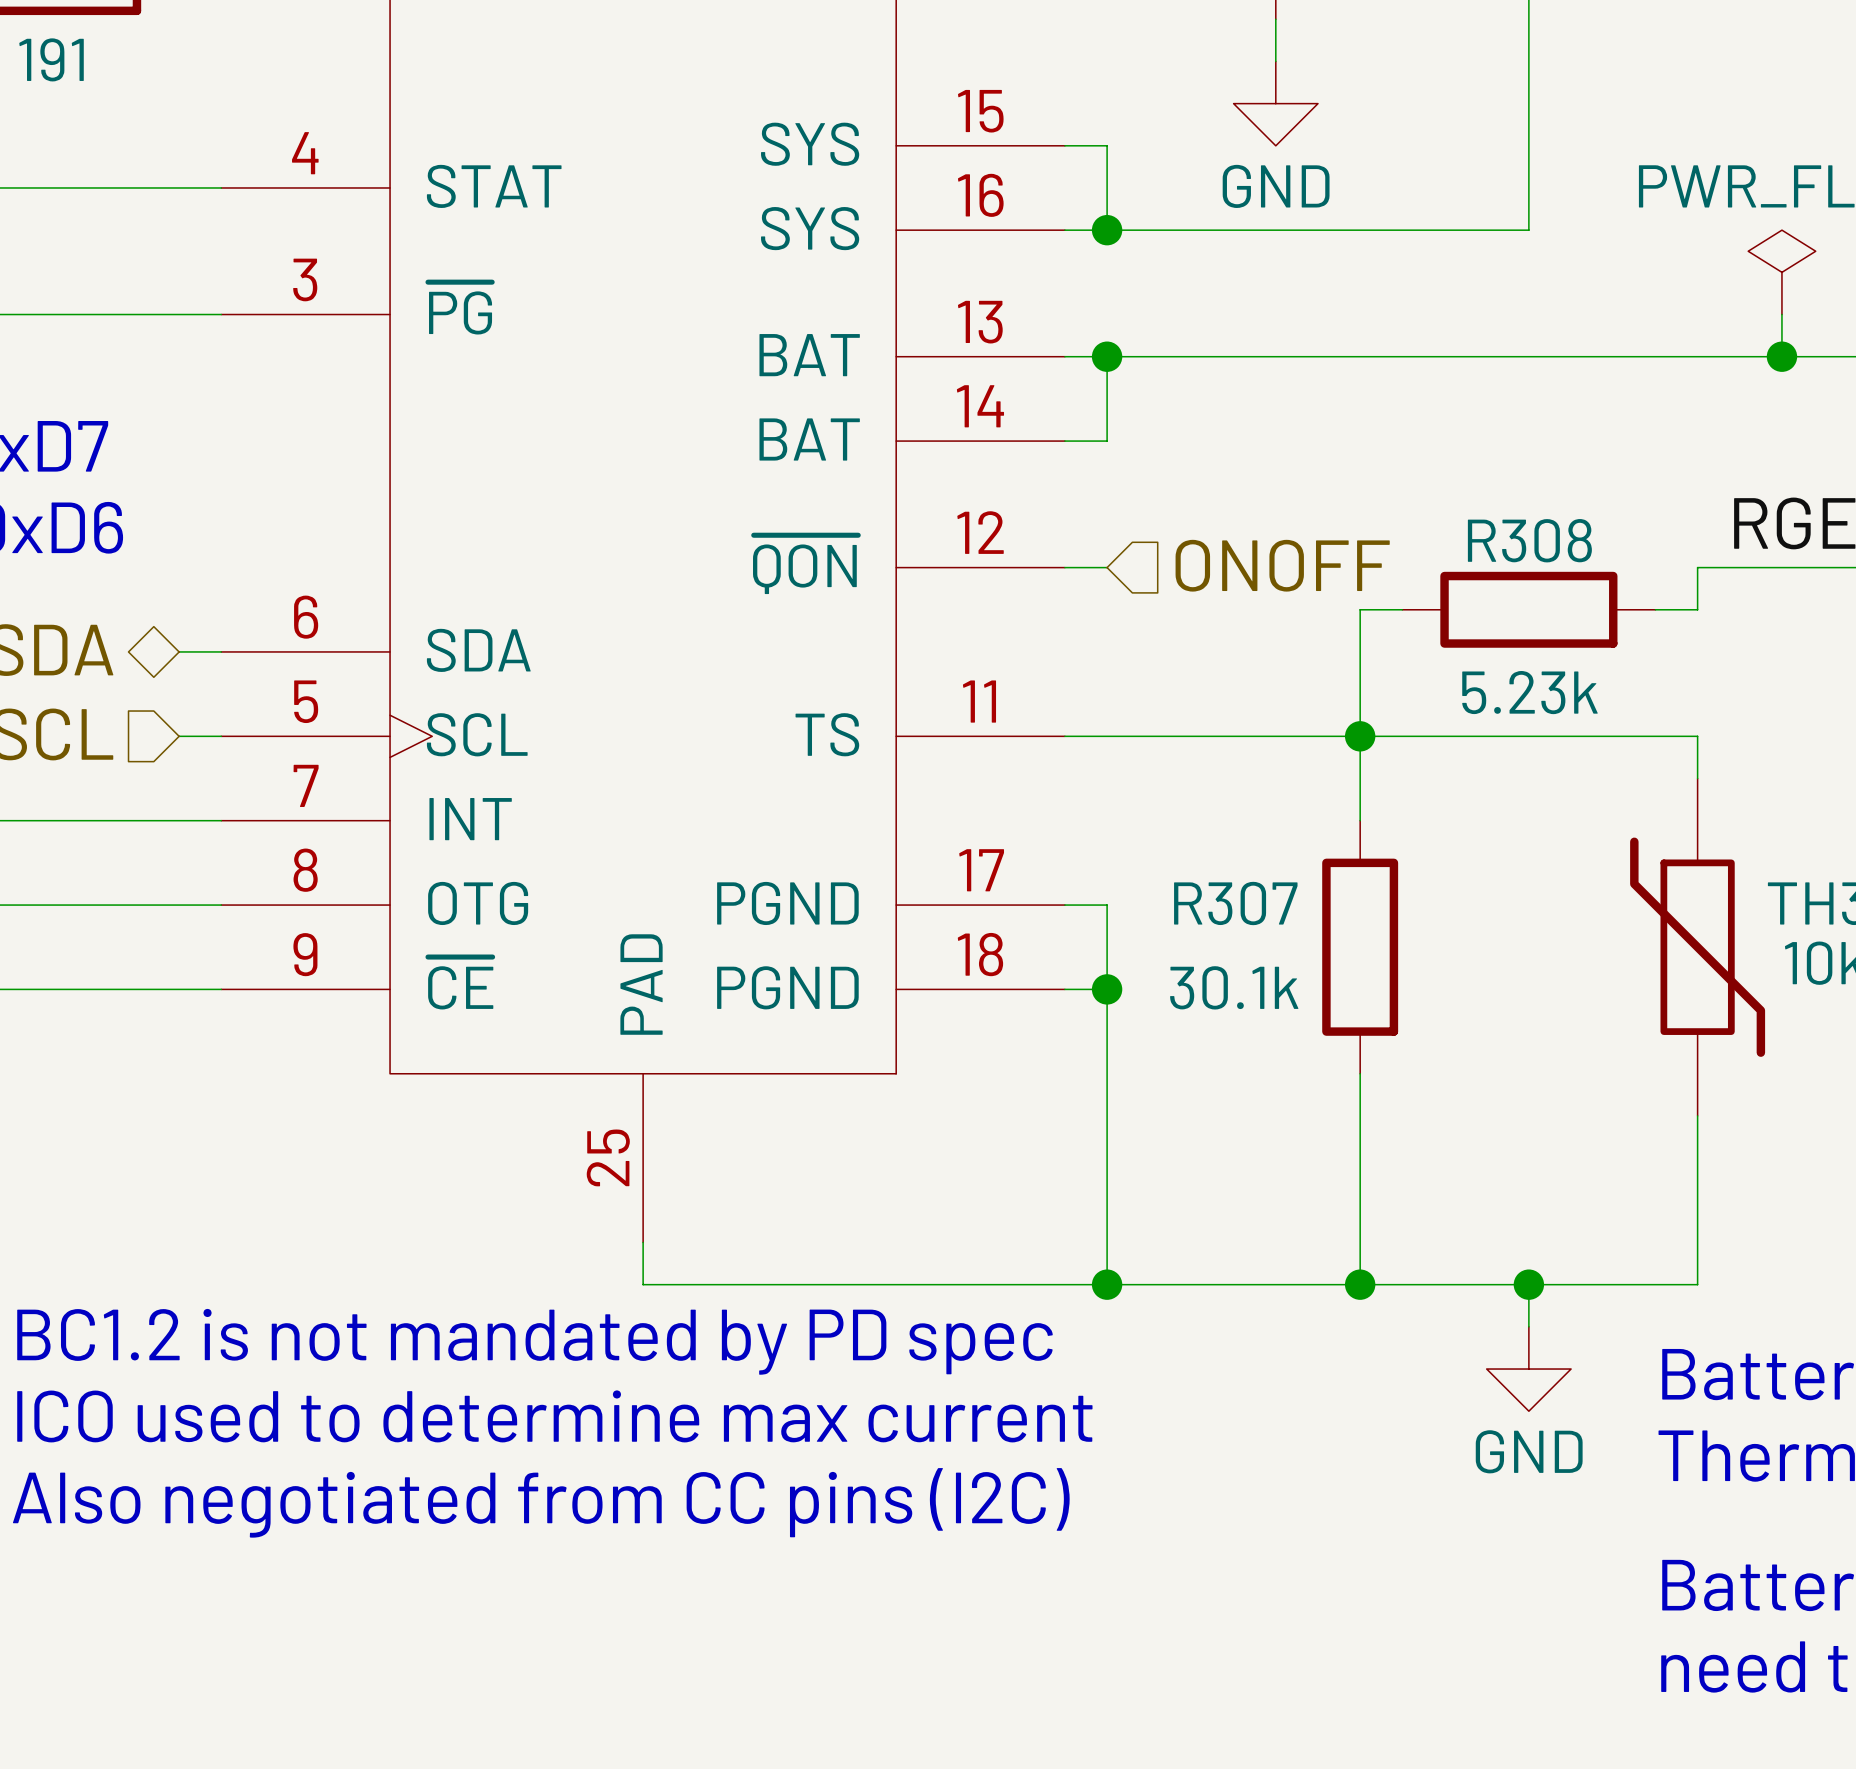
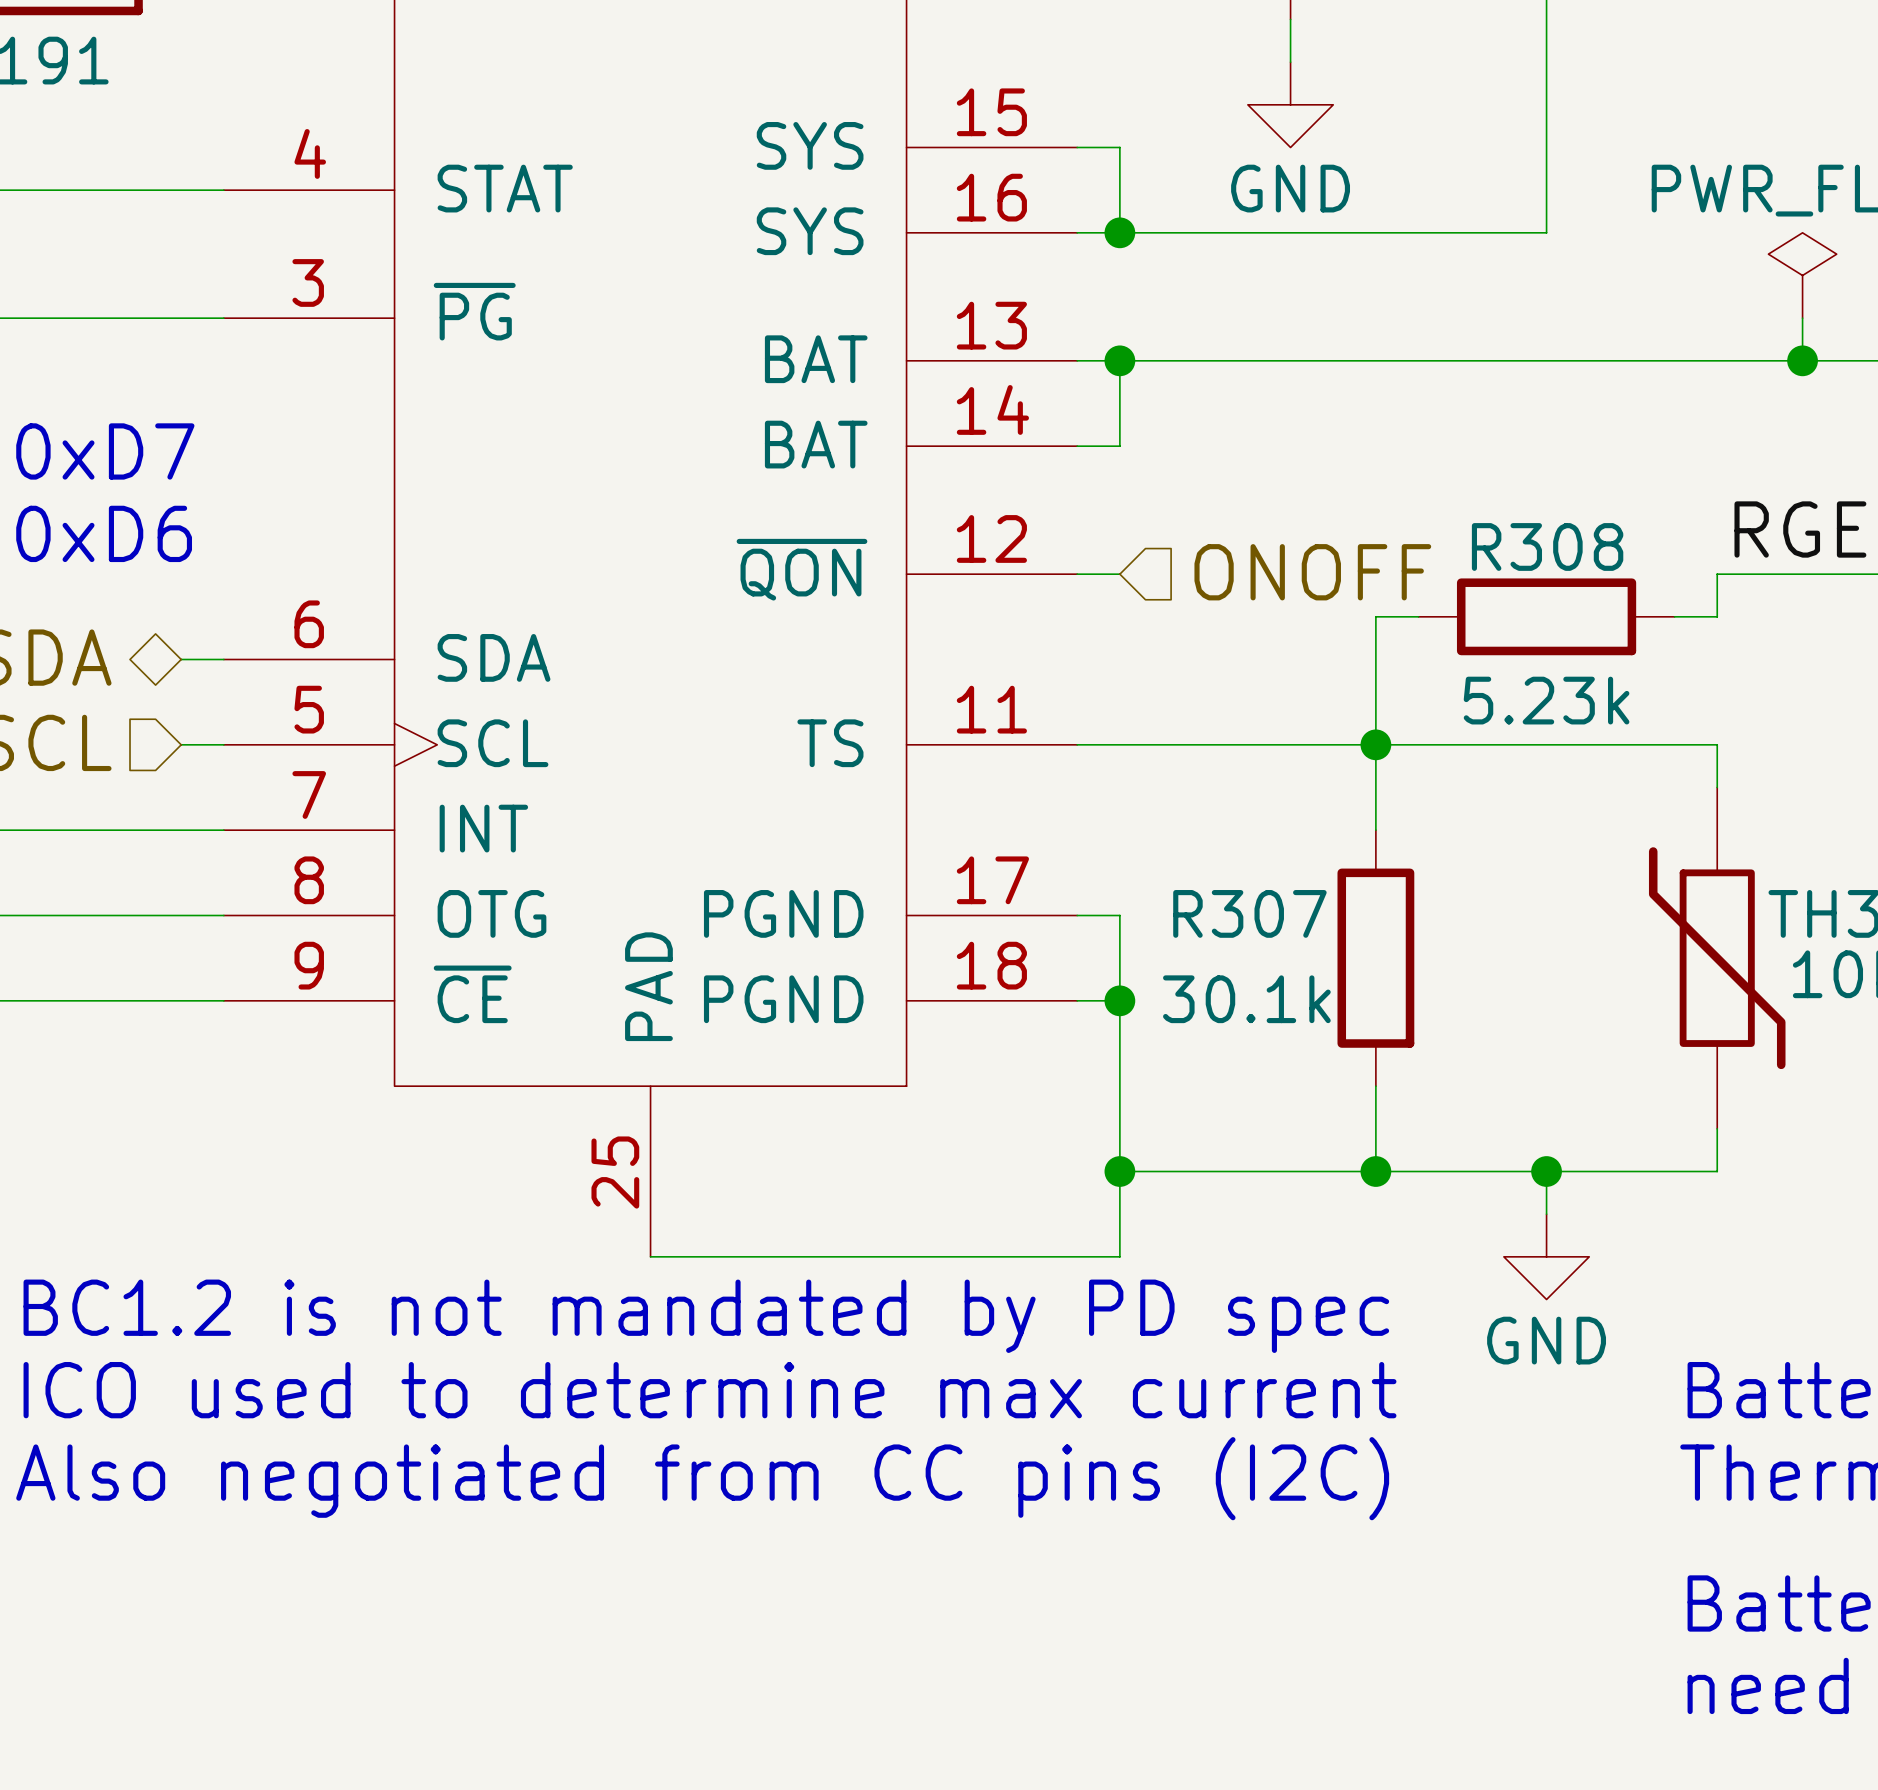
wire: (1360, 1158) (1360, 1284) -> none
junction: none -> (1375, 1171)
junction: none -> (1546, 1171)
wire: (1697, 1158) (1697, 1284) (643, 1284) (643, 1242) -> (1717, 1171) (1119, 1171)
wire: (1107, 1242) (1107, 1284) -> (1119, 1256) (650, 1256)
junction position: (1107, 1284) -> (1119, 1171)
junction: (1360, 1284) -> none
wire: (1528, 1284) (1528, 1326) -> (1546, 1171) (1546, 1214)
junction: (1528, 1284) -> none
text position: BC1.2 is not mandated by PD spec (534, 1341) -> BC1.2 is not mandated by PD spec (706, 1316)
power symbol position: GND (1528, 1369) -> GND (1546, 1256)
text position: ICO used to determine max current (554, 1416) -> ICO used to determine max current (709, 1390)
text position: Also negotiated from CC pins (I2C) (541, 1502) -> Also negotiated from CC pins (I2C) (702, 1478)

